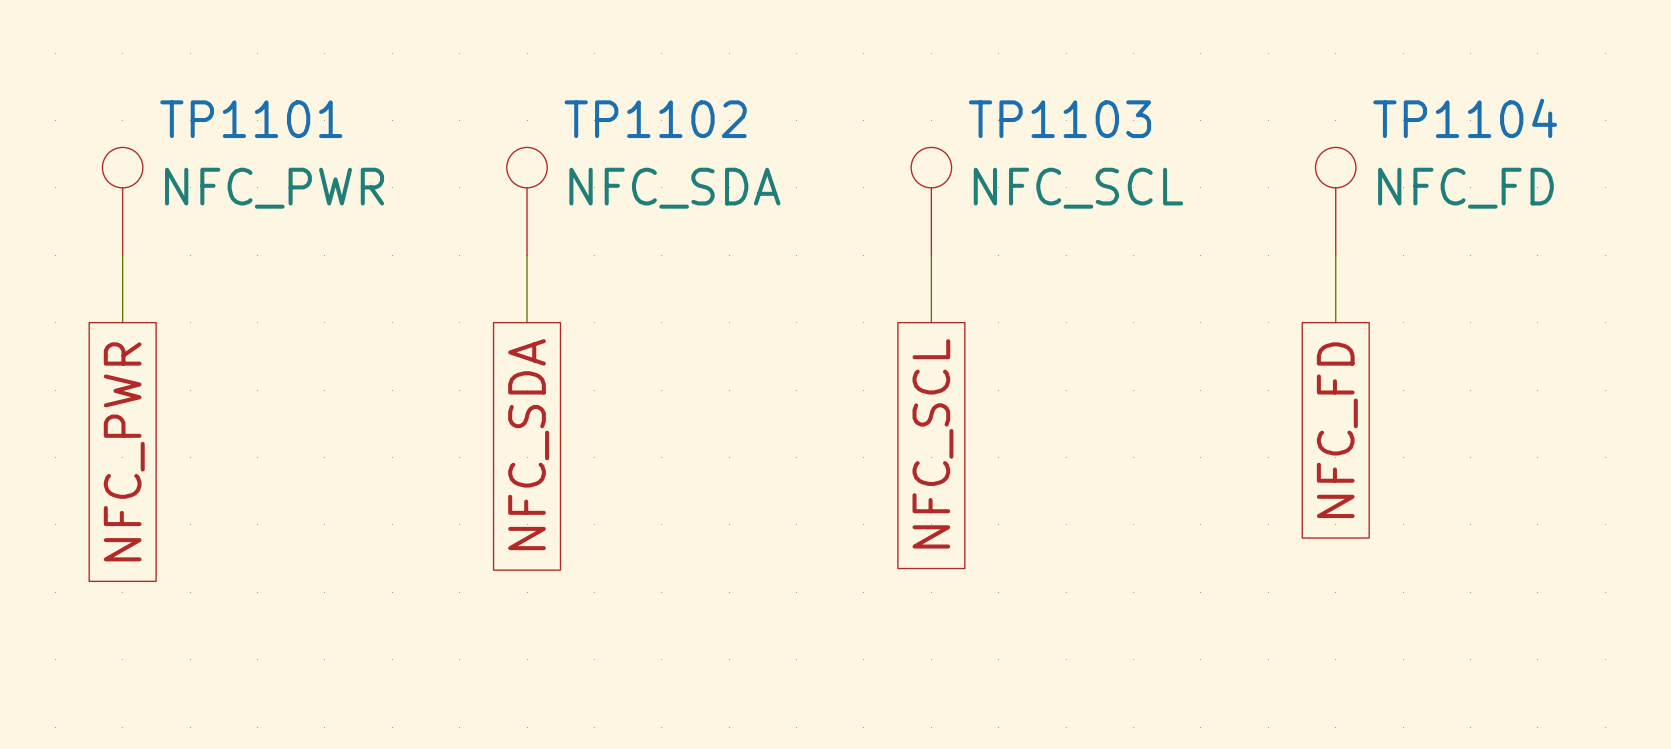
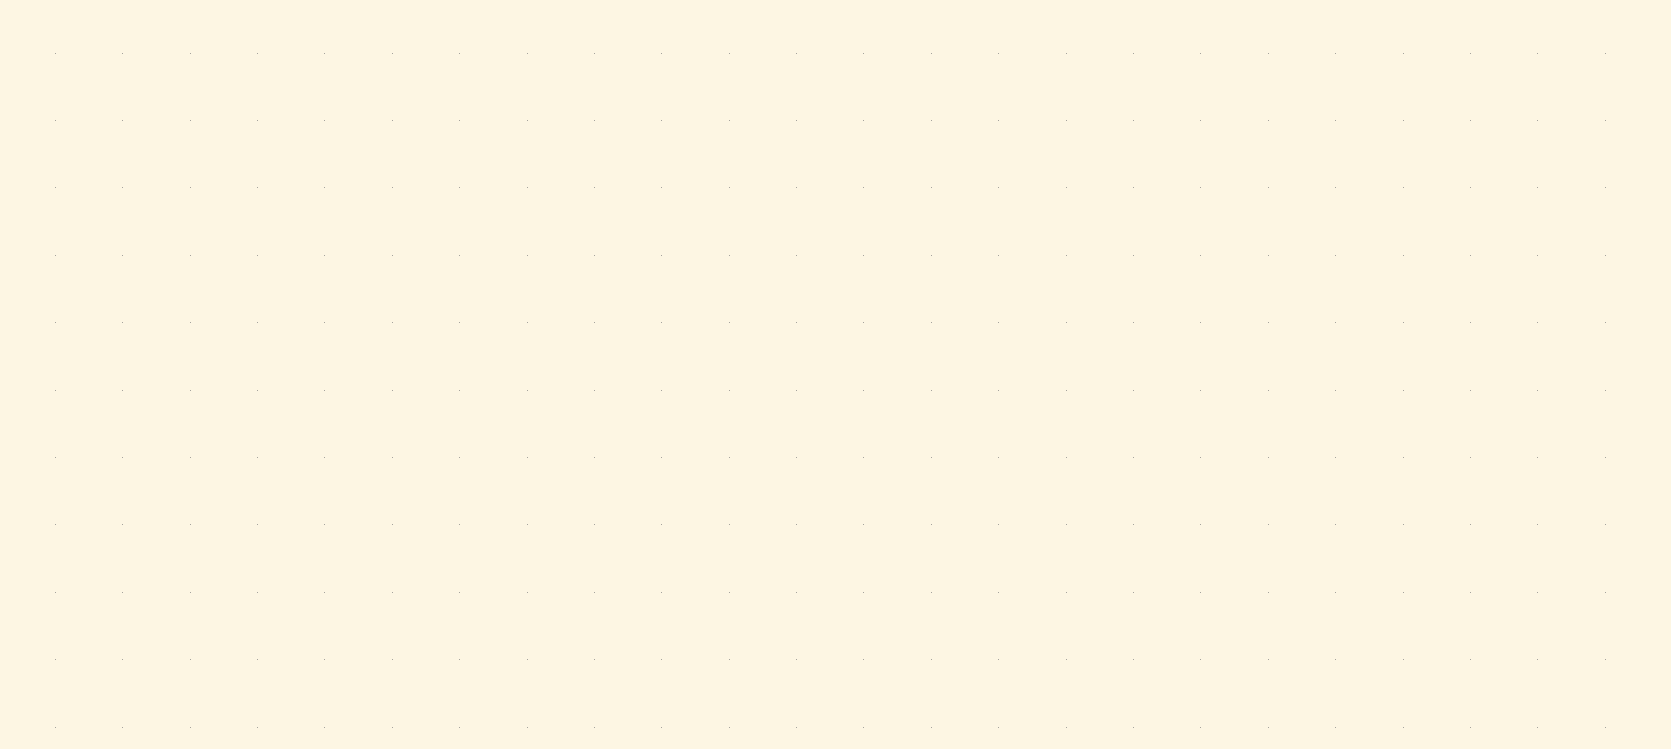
TP1101: NFC_PWR (122, 201) -> none
TP1102: NFC_SDA (527, 201) -> none
TP1103: NFC_SCL (931, 201) -> none
TP1104: NFC_FD (1335, 201) -> none
wire: (122, 255) (122, 322) -> none
wire: (527, 255) (527, 322) -> none
wire: (931, 255) (931, 322) -> none
wire: (1335, 255) (1335, 322) -> none
global label: NFC_FD (1337, 430) -> none
global label: NFC_SCL (932, 443) -> none
global label: NFC_SDA (528, 444) -> none
global label: NFC_PWR (124, 451) -> none

